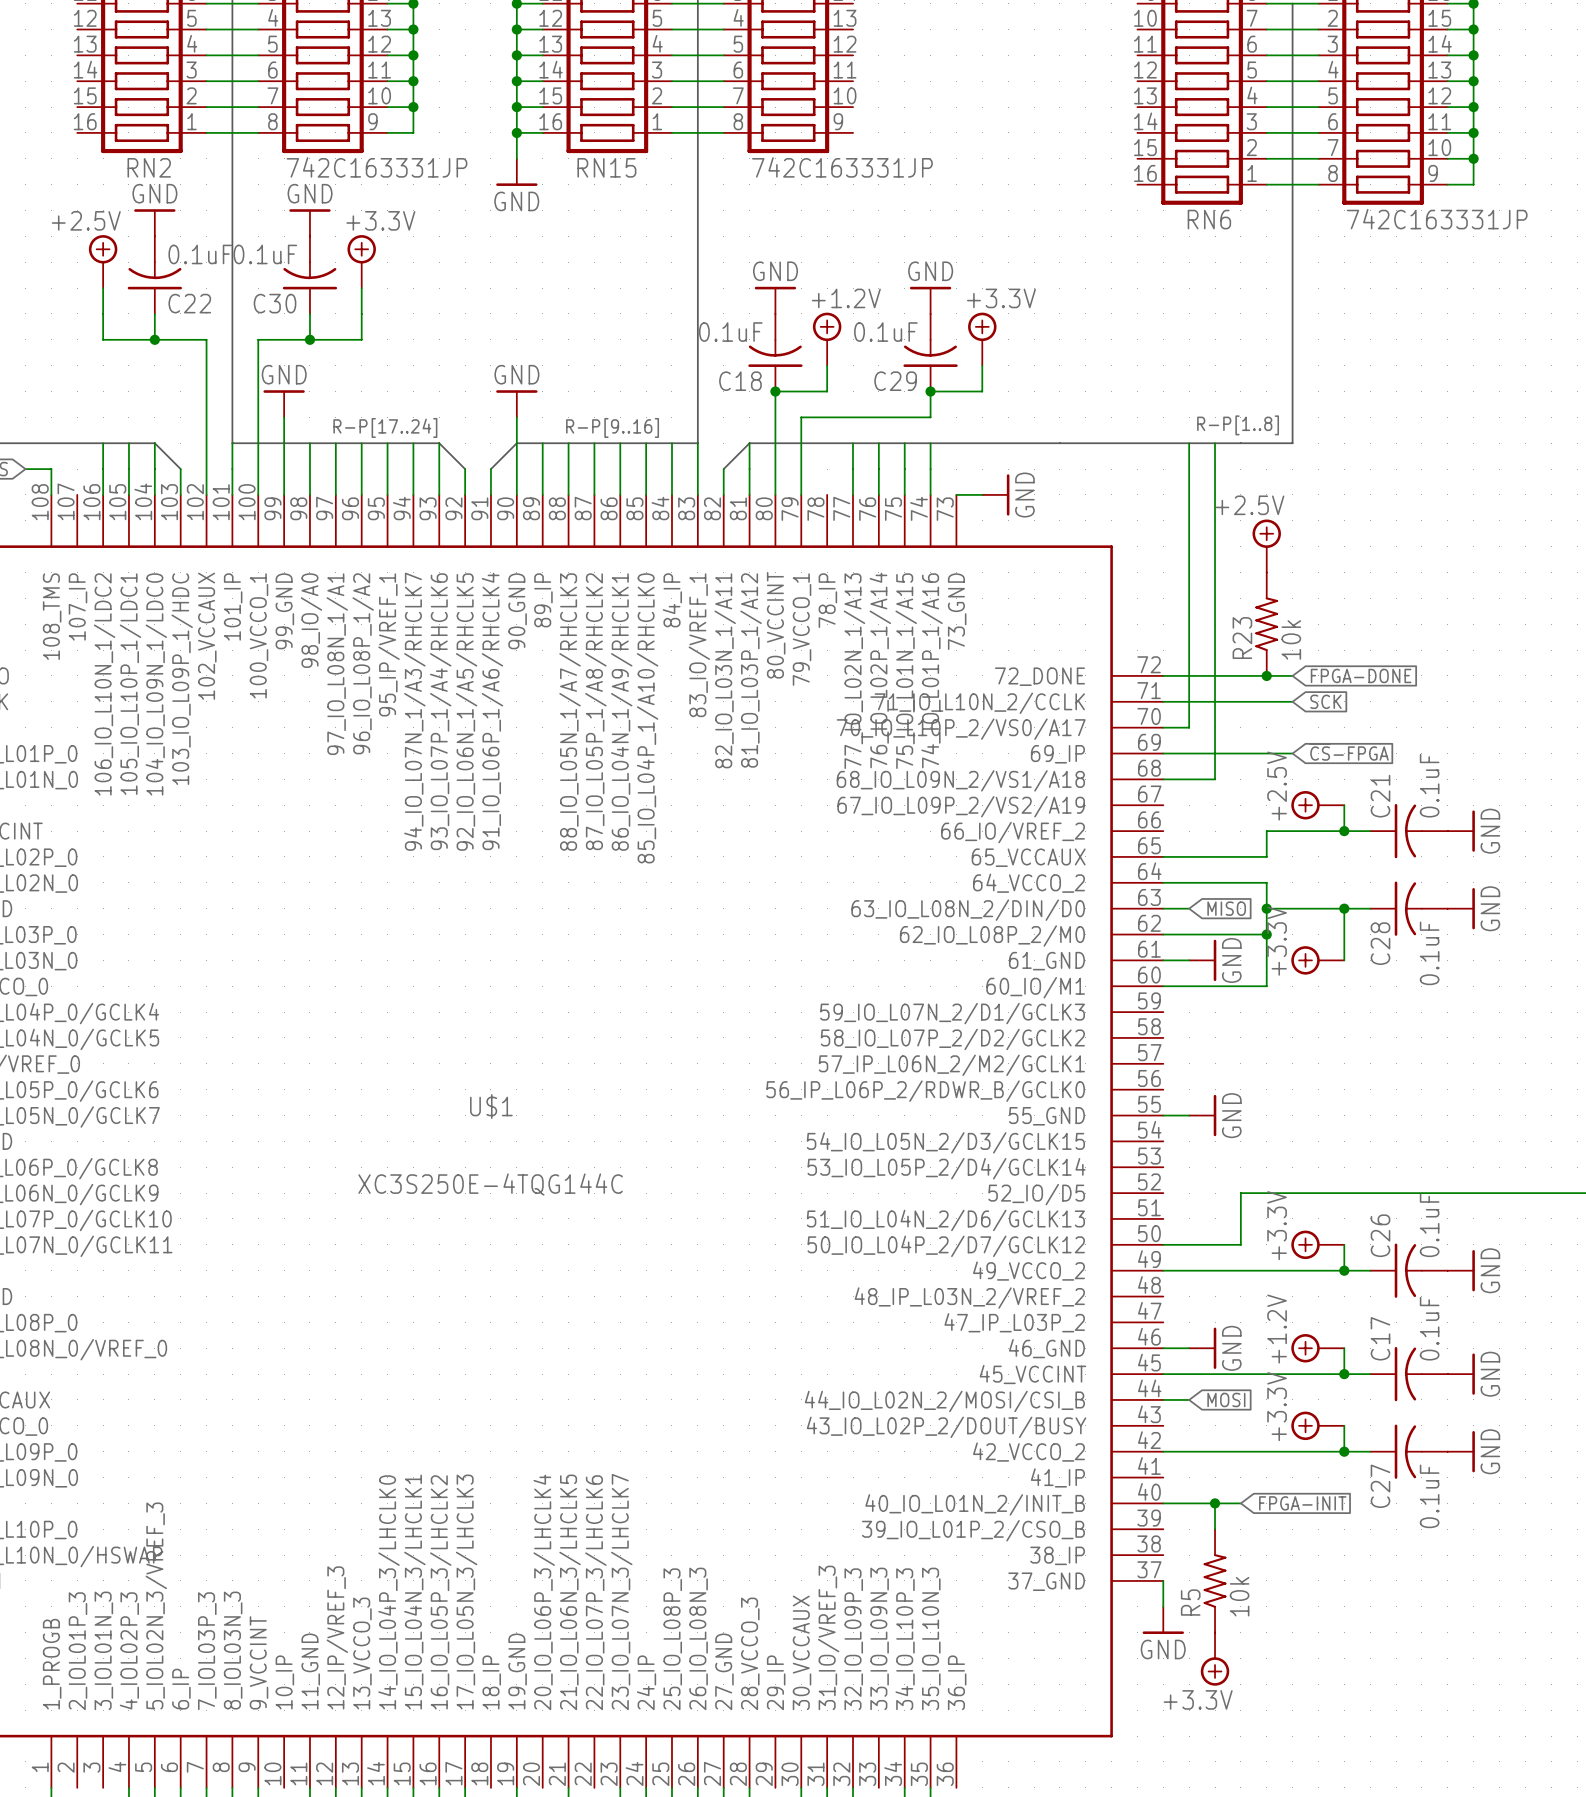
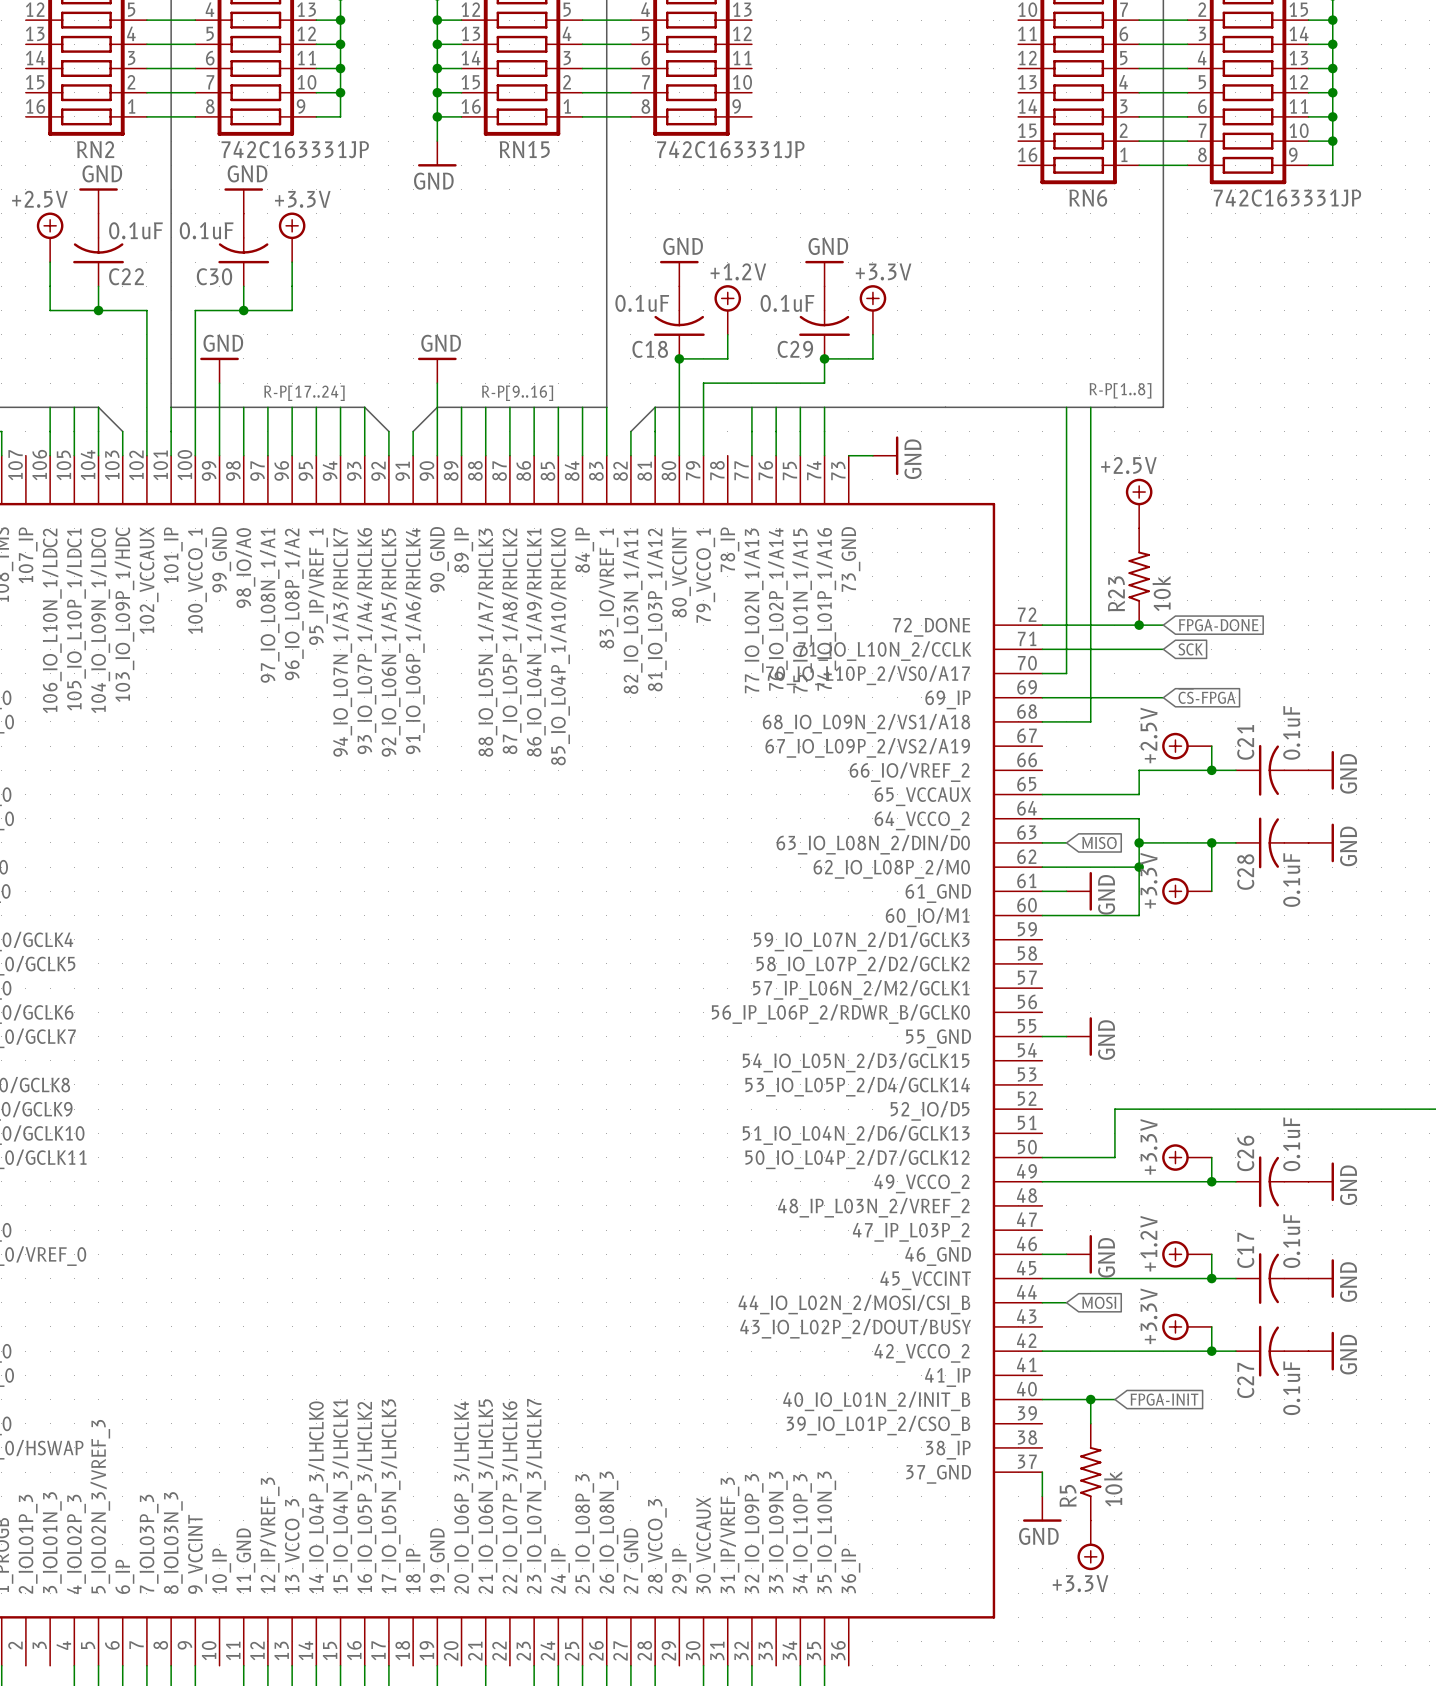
U$1 name: U$1 (491, 1106) -> none
U$1 value: XC3S250E-4TQG144C (490, 1184) -> none
U$1 pin name: 31_IO/VREF_3 (828, 1637) -> 31_IP/VREF_3 (729, 1535)

